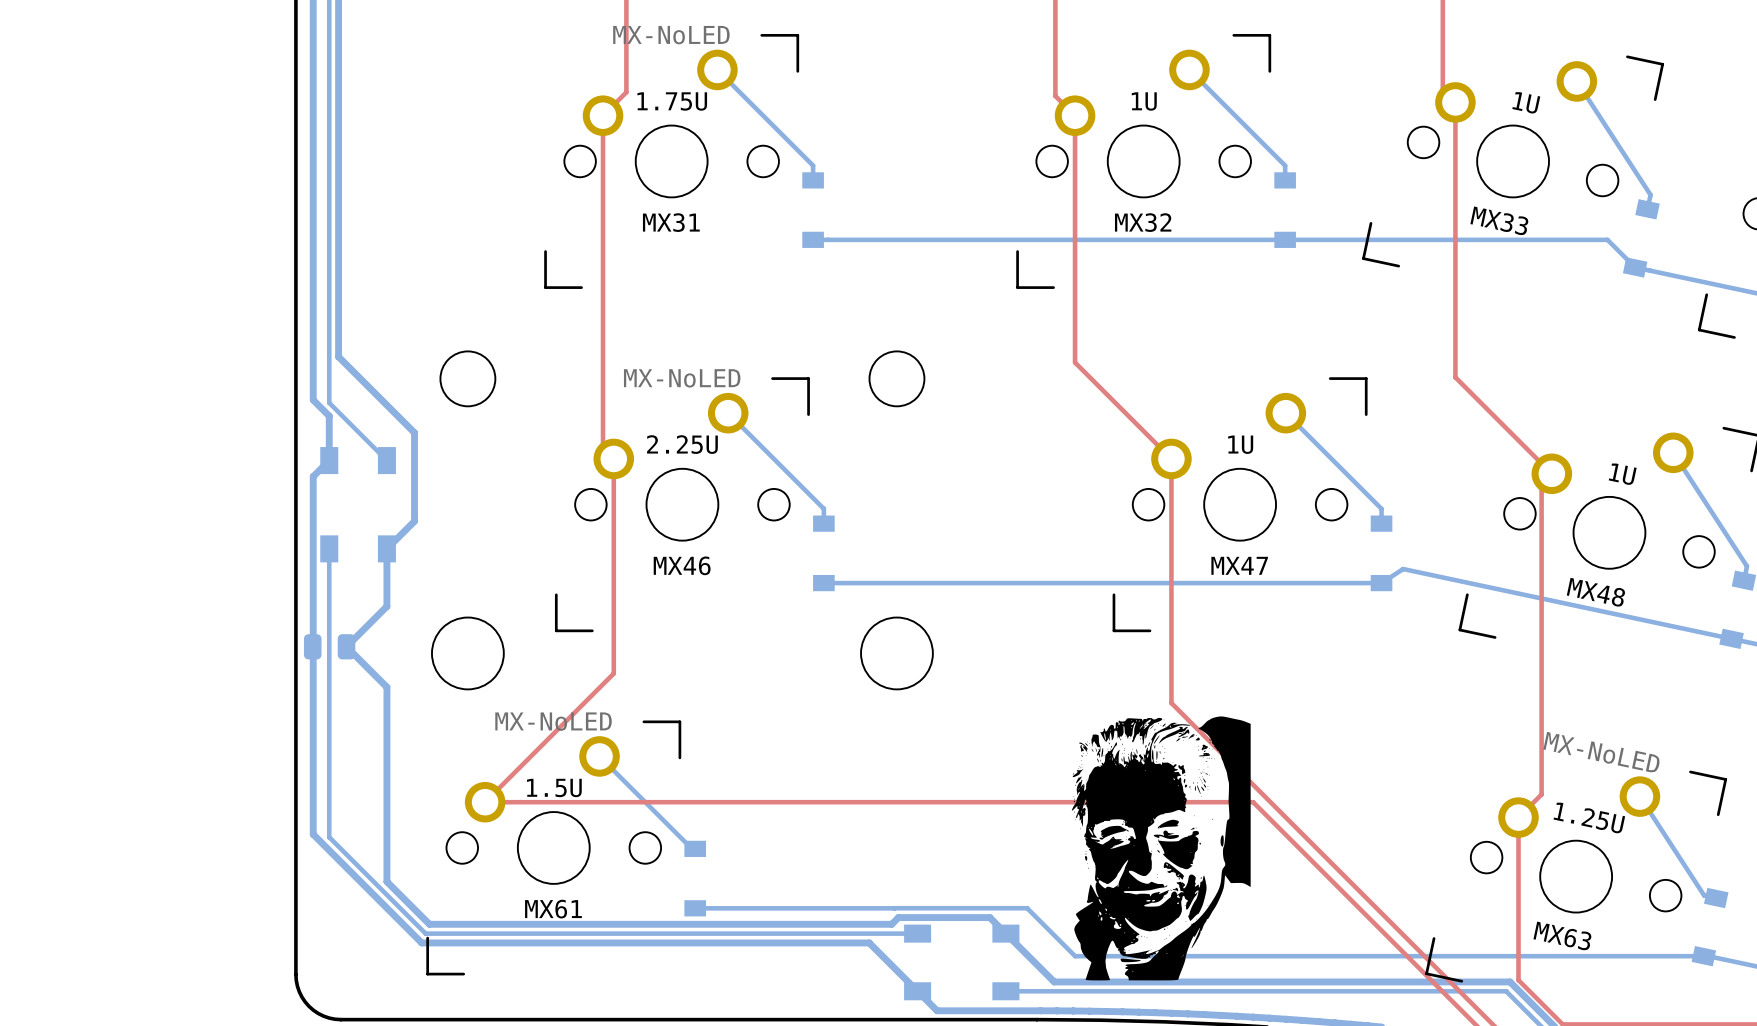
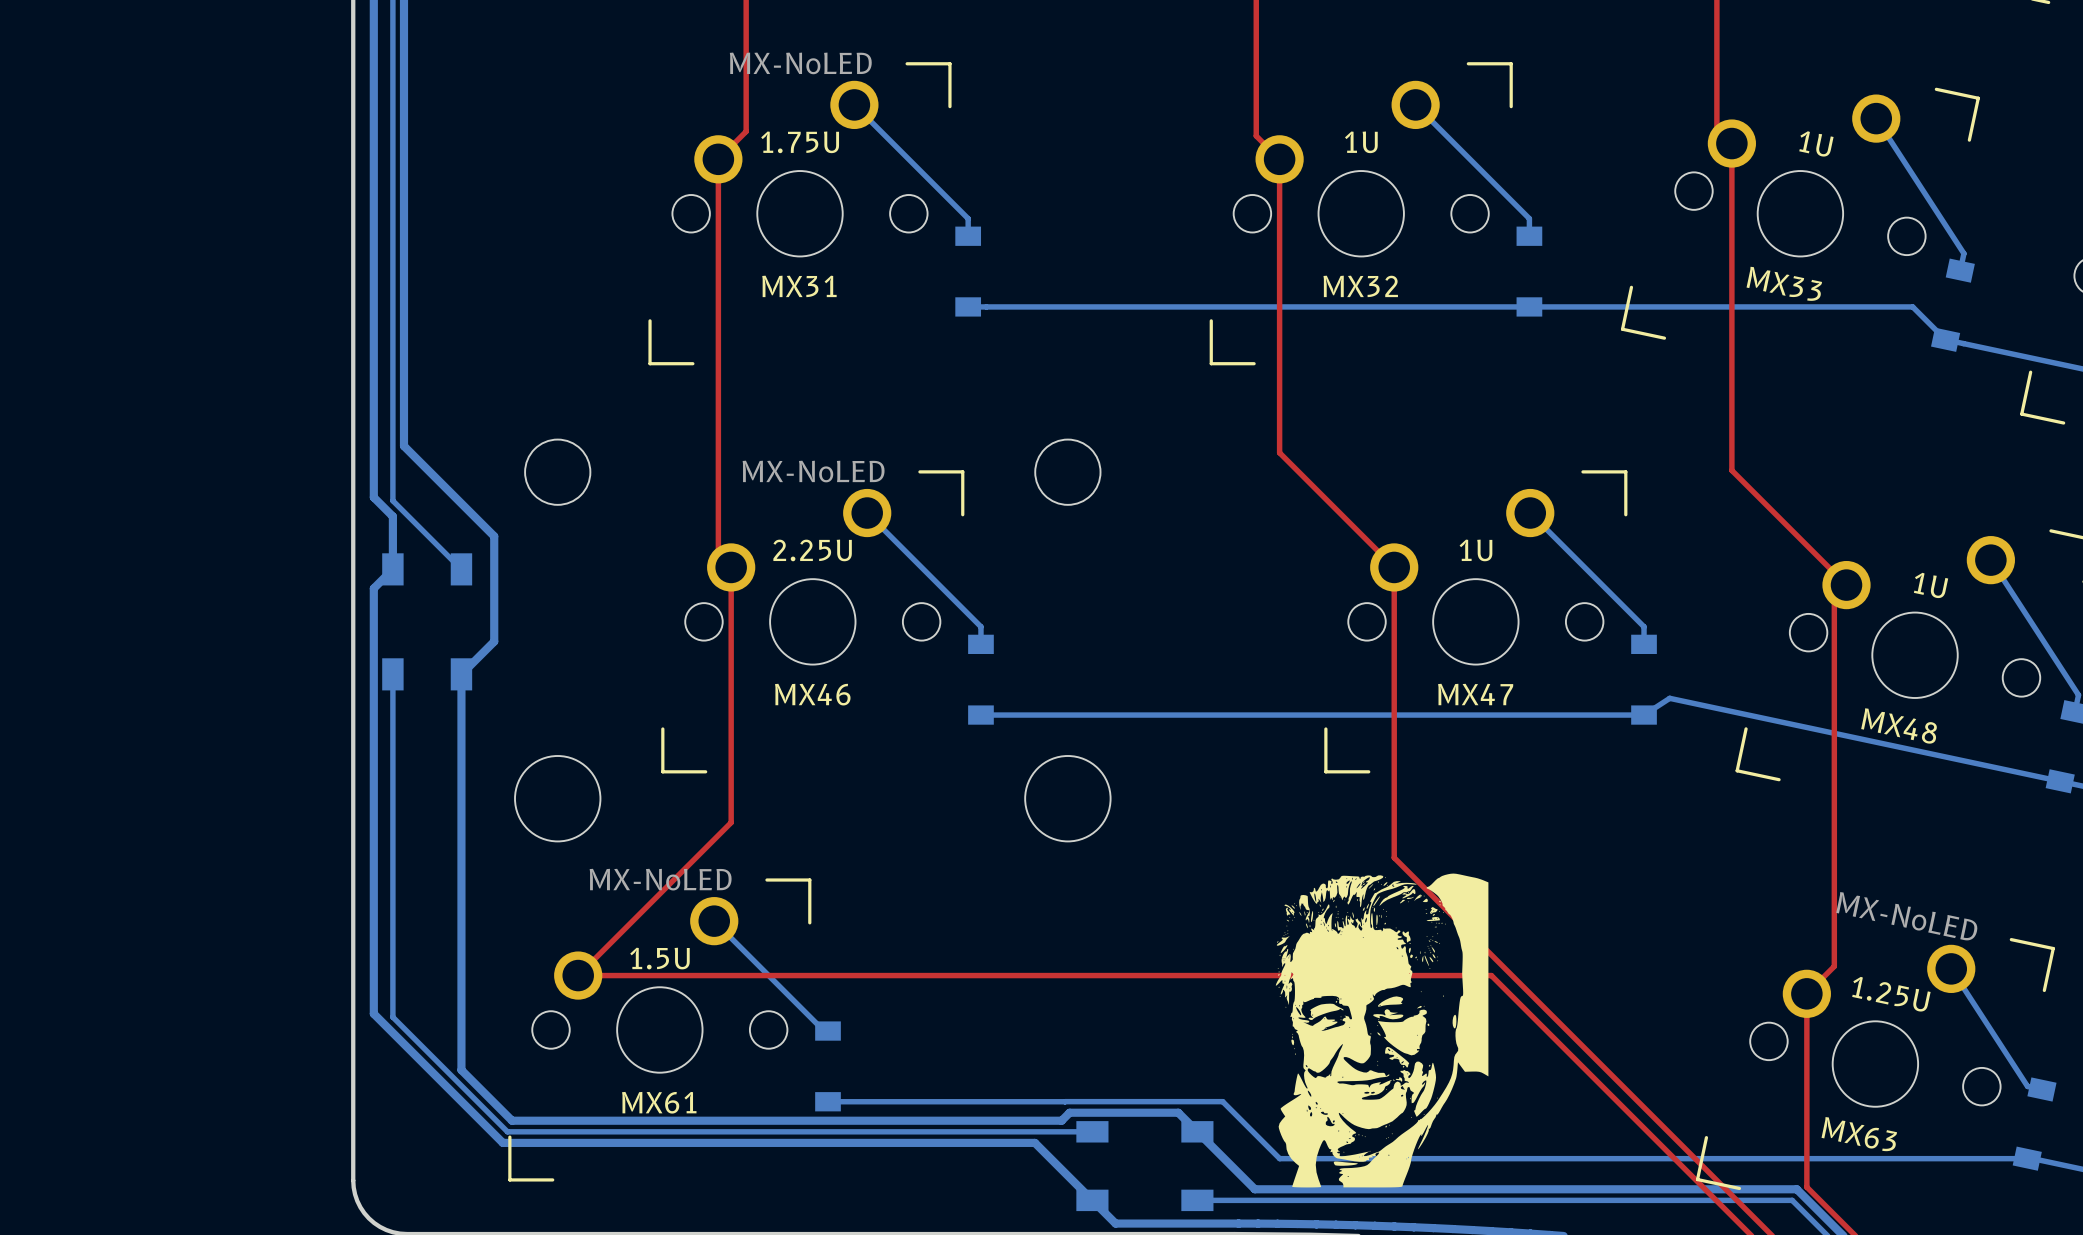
bottom track: (386, 606) (346, 646) (386, 687) -> (461, 742) (461, 838)
part: (329, 646) -> none

